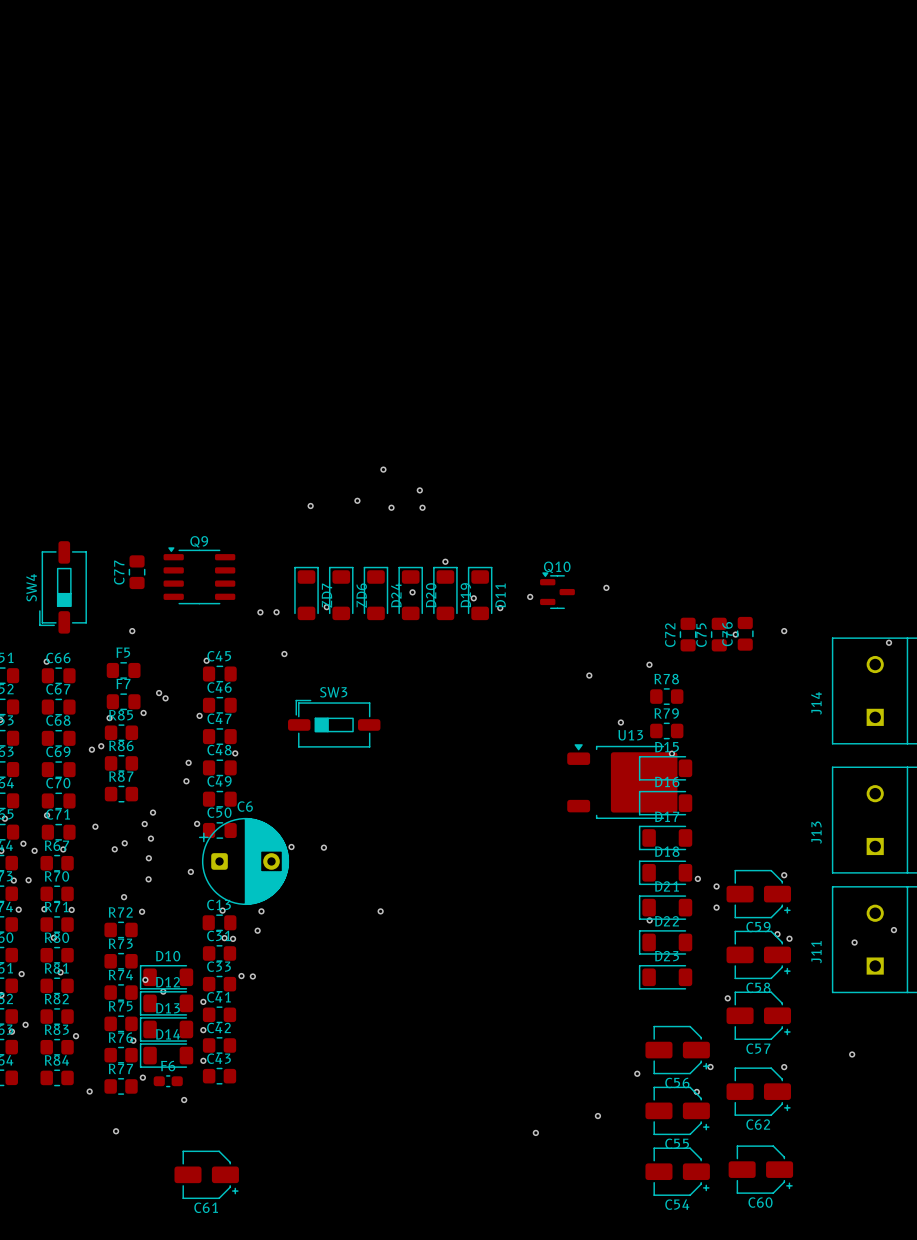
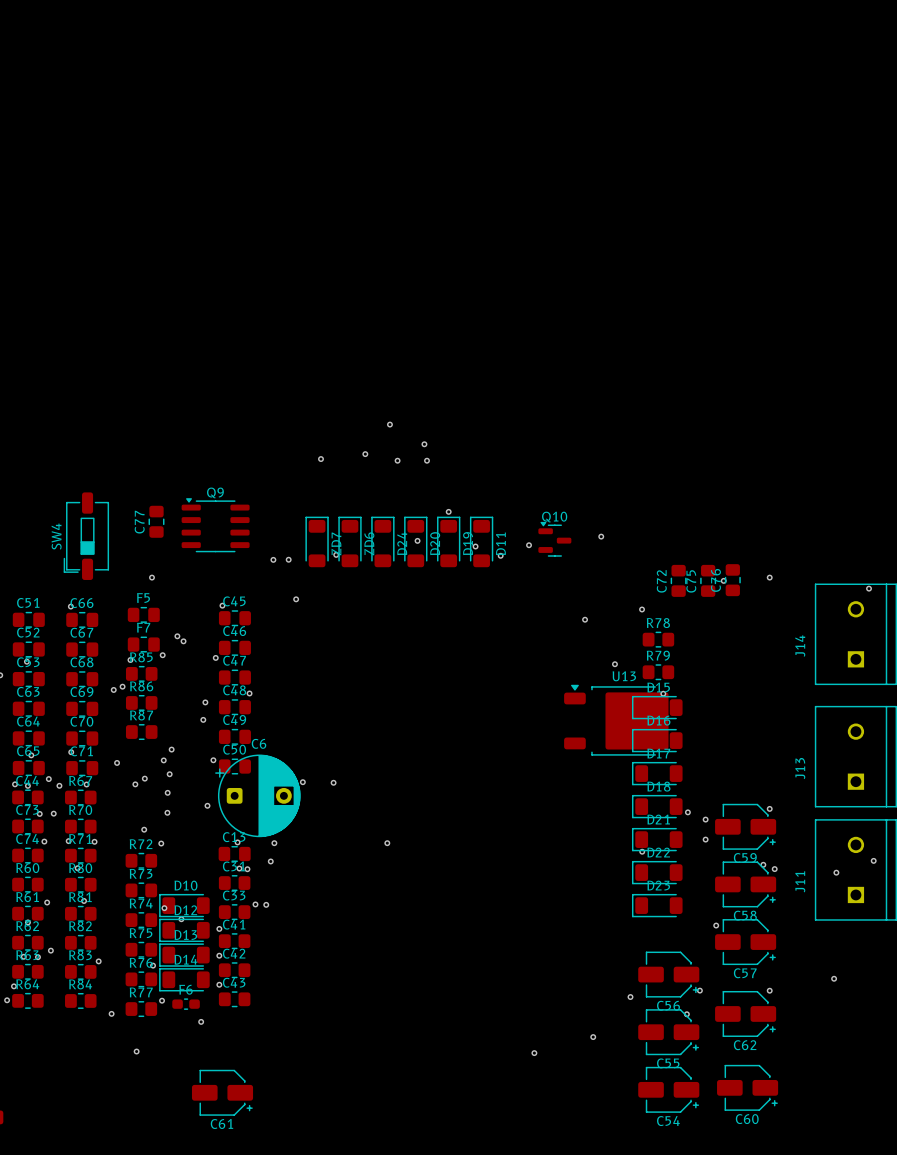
SW3: (334, 723) -> none

